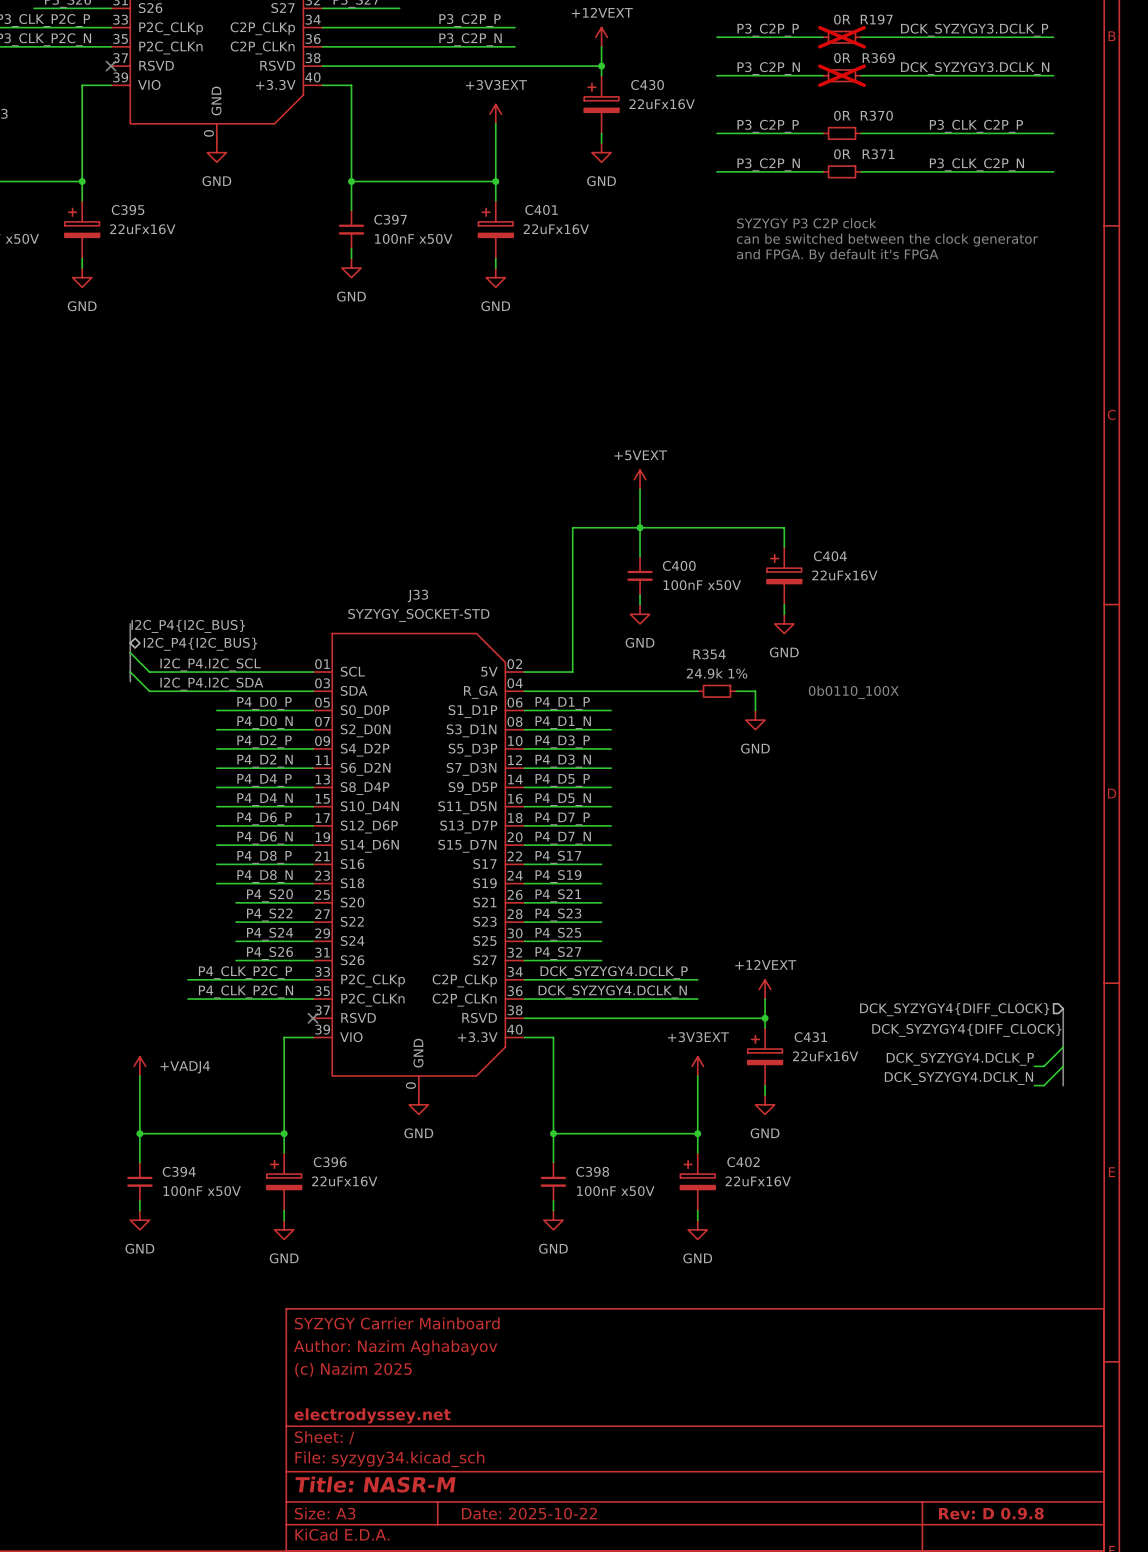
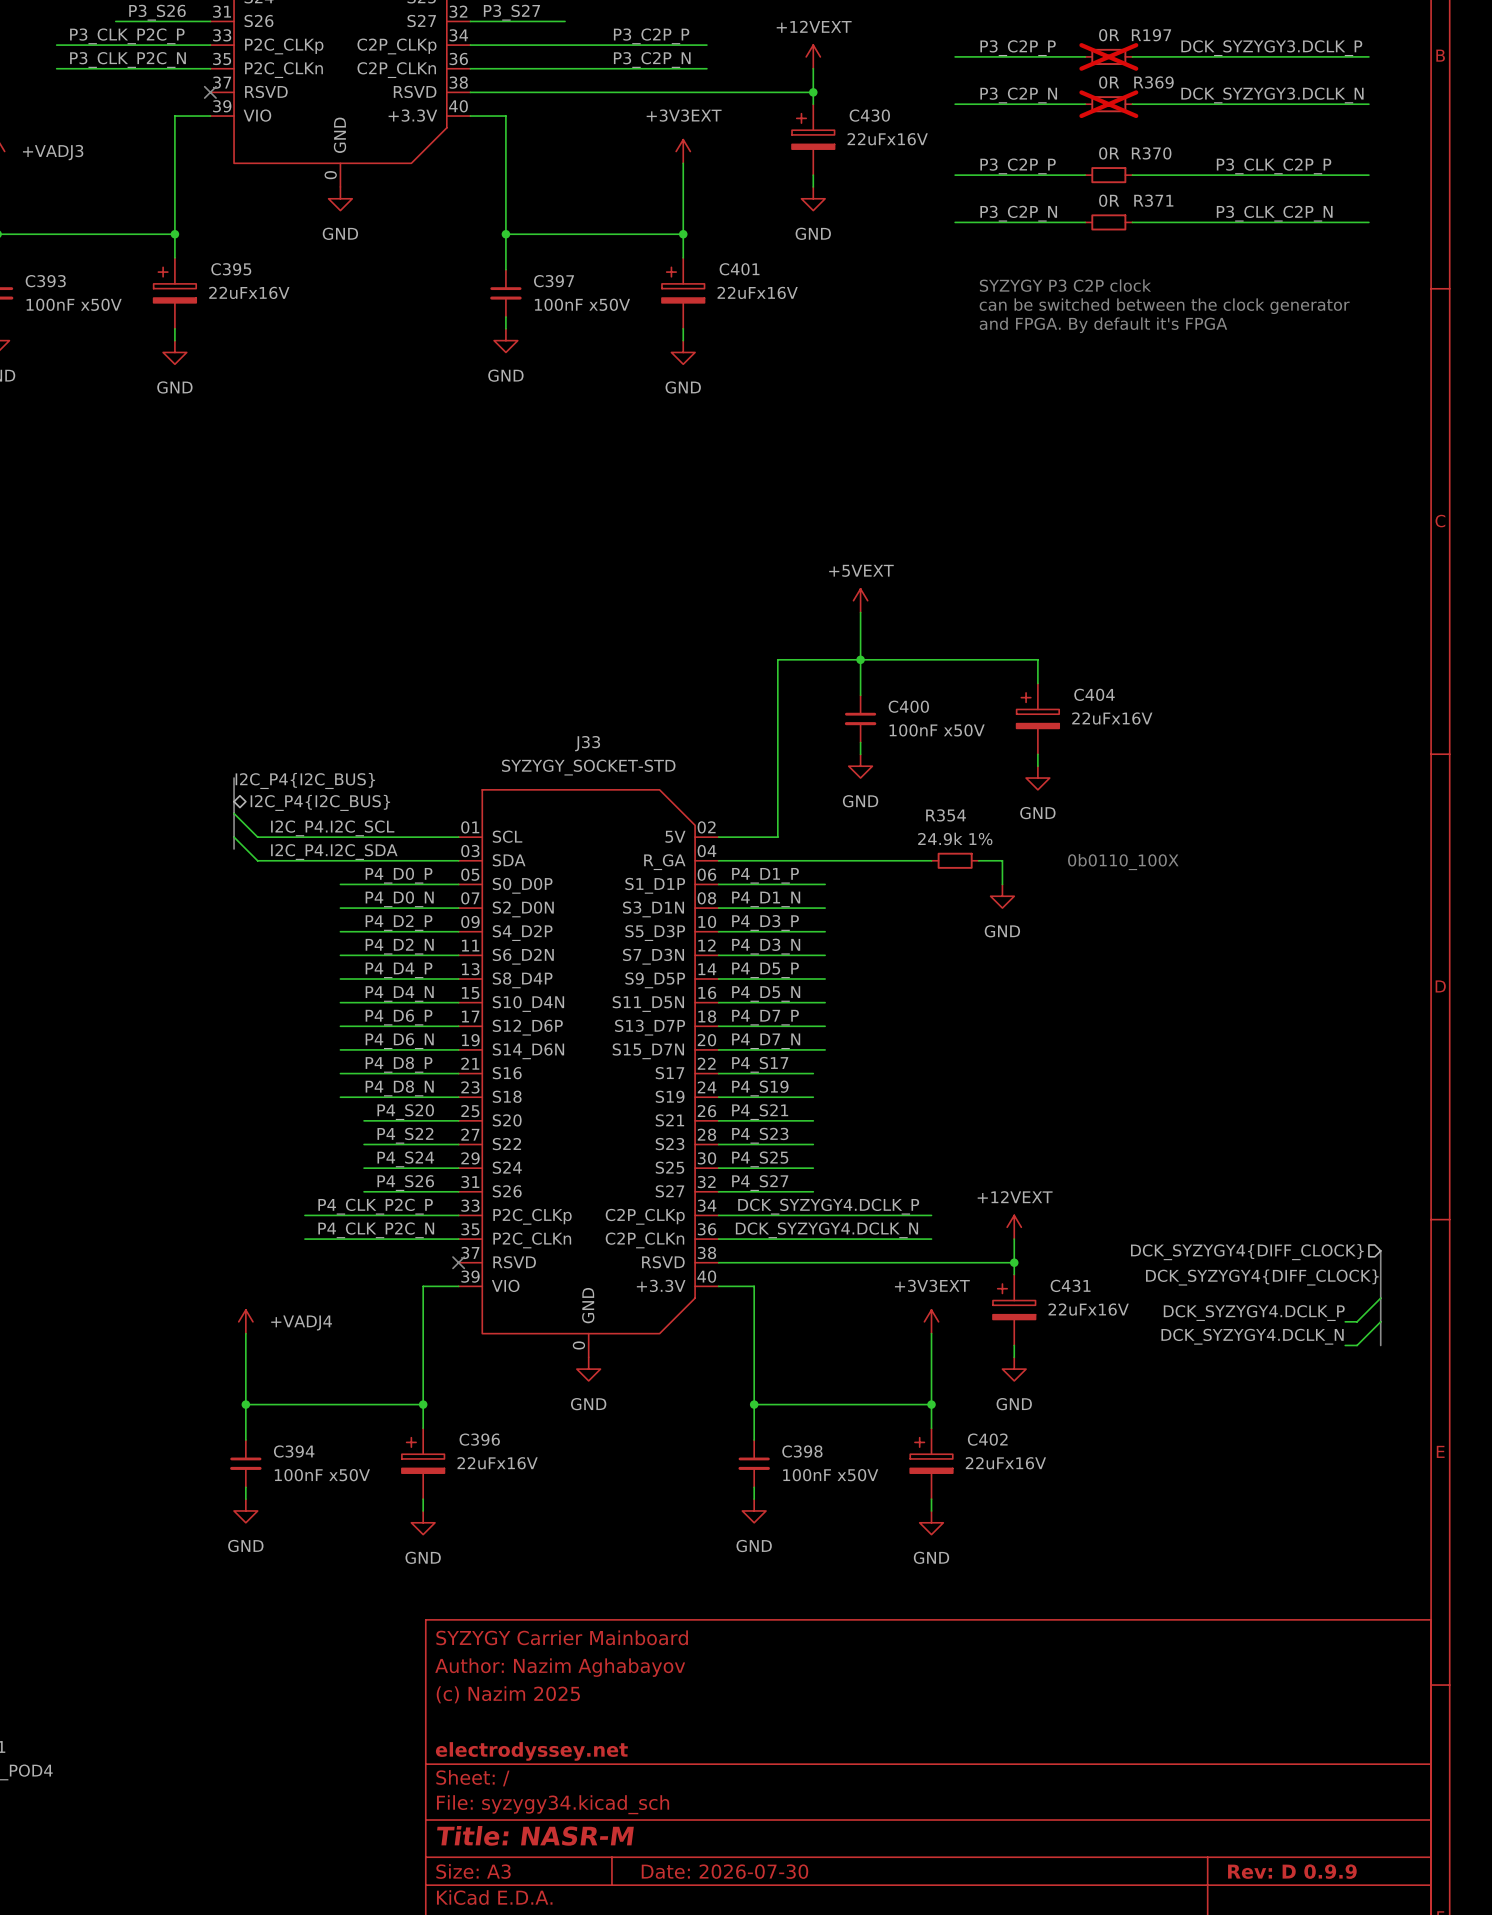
title block: Date: 2025-10-22 (529, 1513) -> Date: 2026-07-30 (724, 1871)
title block: Rev: D 0.9.8 (991, 1513) -> Rev: D 0.9.9 (1292, 1871)

